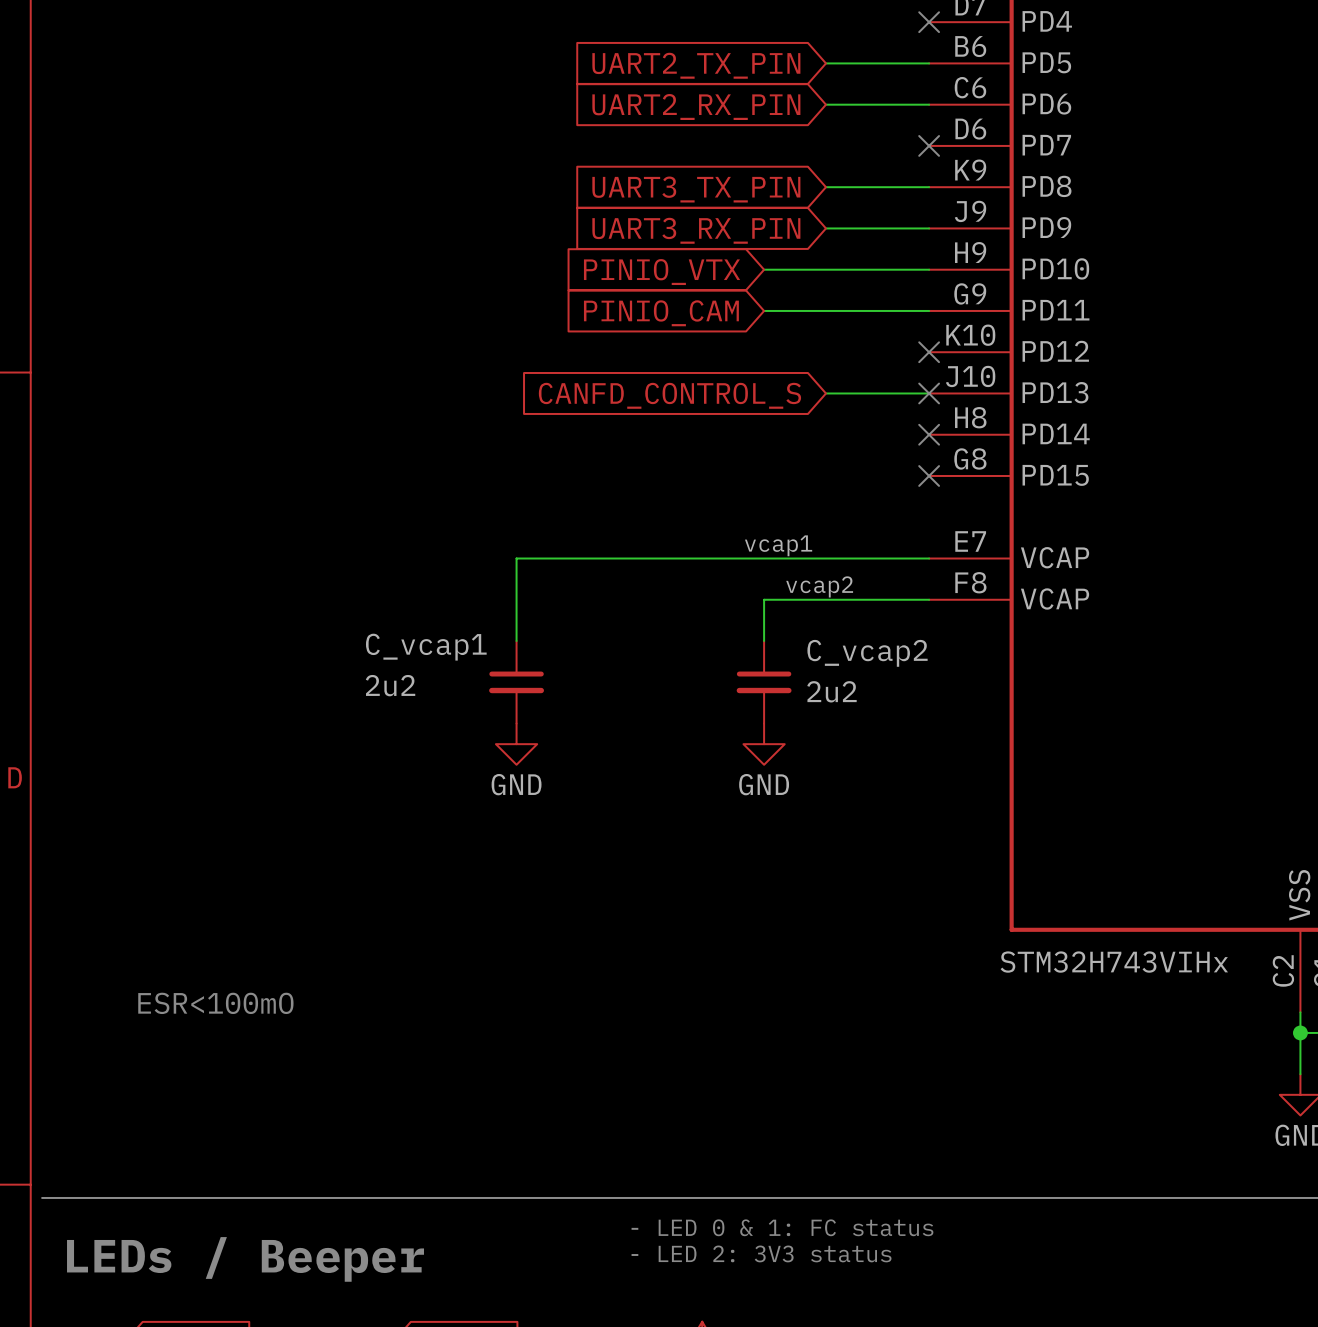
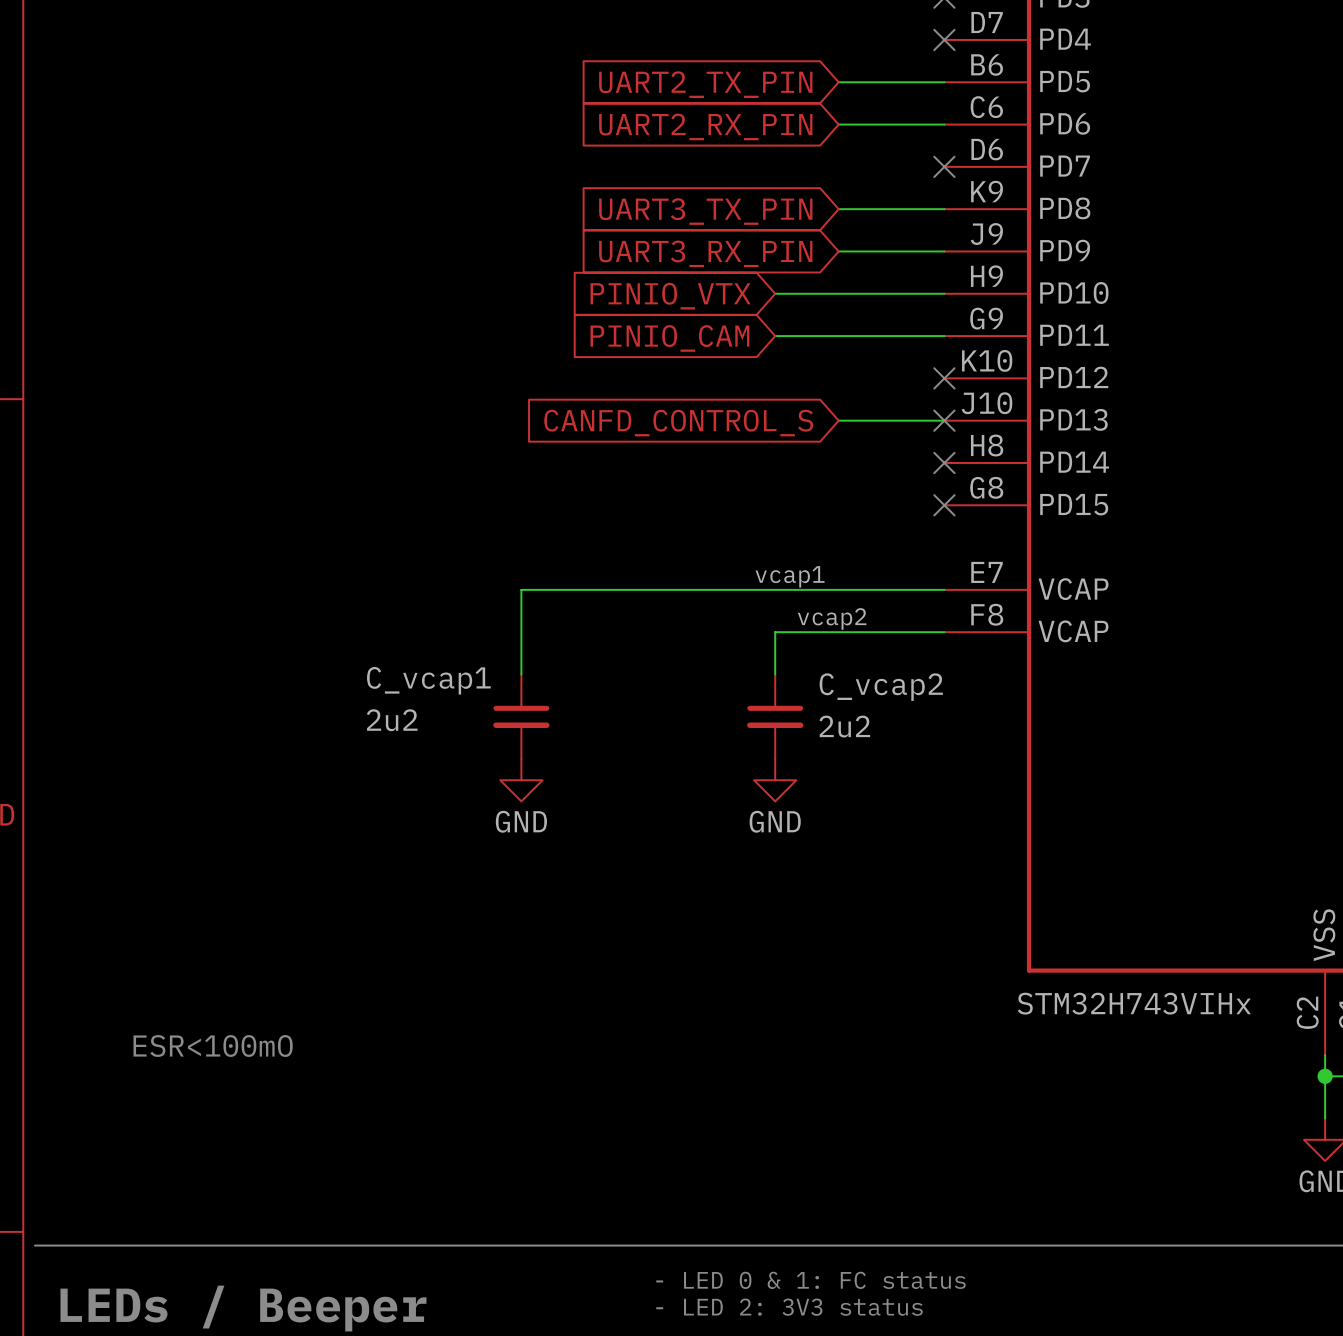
text position: - LED 0 & 1: FC status (782, 1227) -> - LED 0 & 1: FC status (810, 1280)
text position: - LED 2: 3V3 status (761, 1253) -> - LED 2: 3V3 status (789, 1307)

